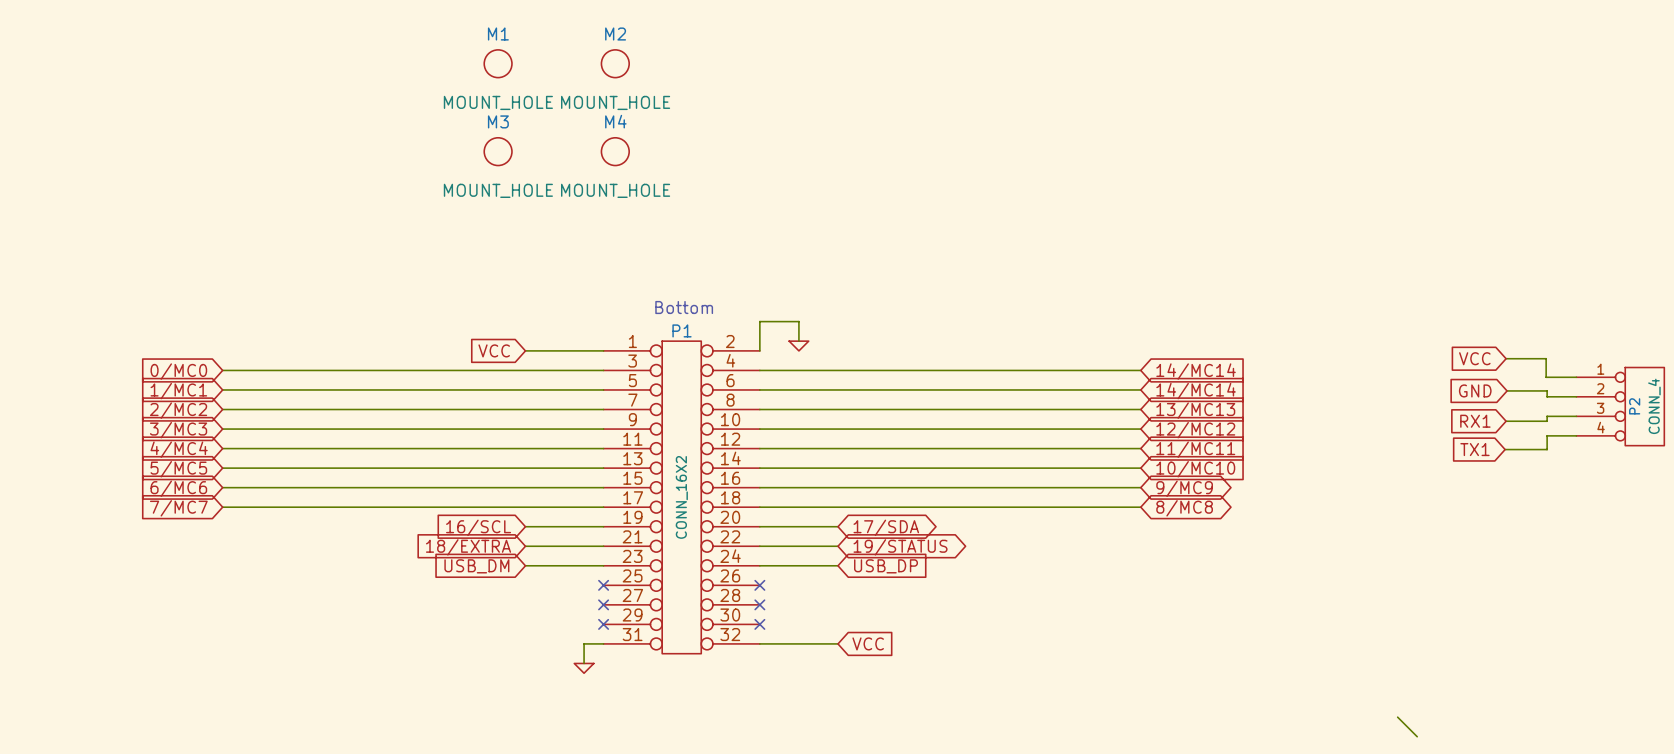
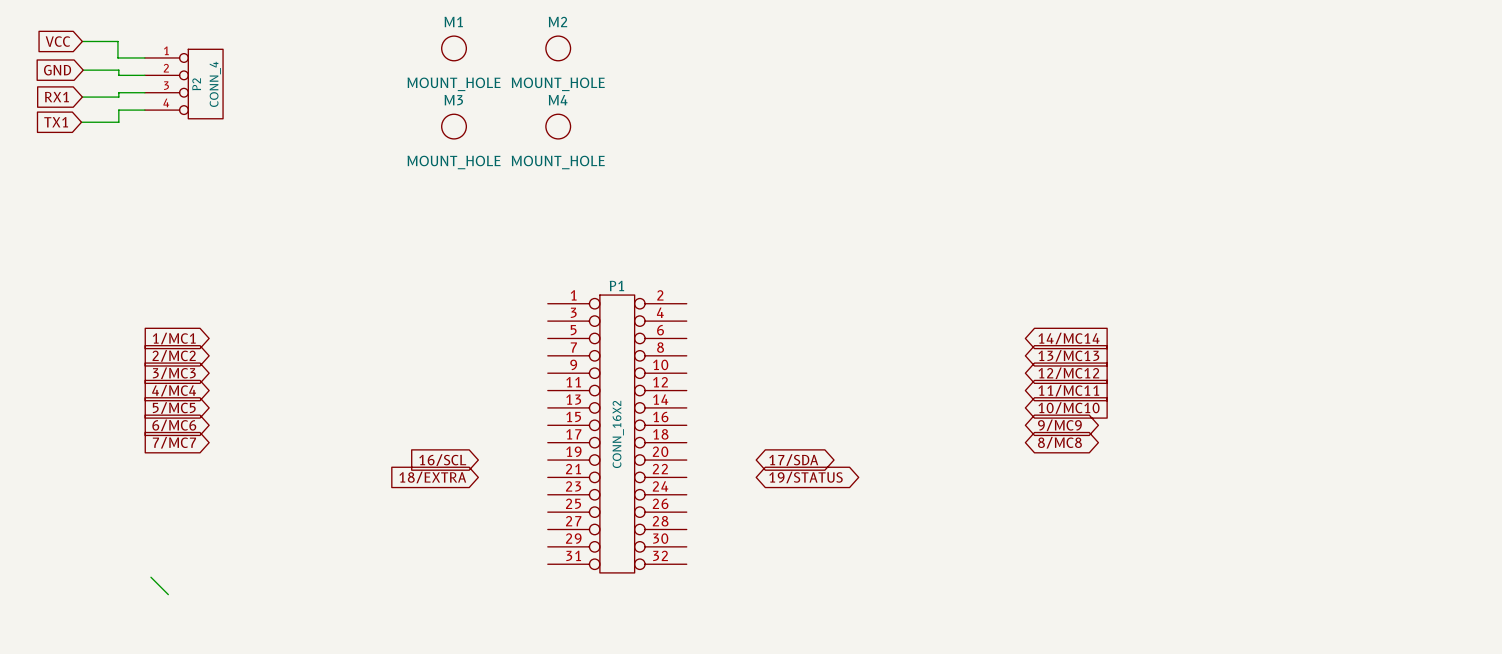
global label: none -> VCC (57, 41)
wire: none -> (82, 41) (117, 41) (117, 57) (144, 57)
global label: none -> GND (57, 70)
wire: none -> (83, 70) (118, 70) (118, 75) (144, 75)
wire: none -> (144, 92) (118, 92) (118, 97) (82, 97)
global label: none -> RX1 (56, 97)
wire: none -> (144, 110) (118, 110) (118, 122) (81, 122)
global label: none -> TX1 (56, 122)
text: Bottom (684, 307) -> none
wire: (798, 341) (798, 321) (759, 321) (759, 350) -> none
power symbol: (798, 346) -> none
global label: VCC (494, 350) -> none
wire: (525, 350) (603, 350) -> none
global label: VCC (1474, 358) -> none
wire: (1506, 358) (1546, 358) (1546, 377) (1576, 377) -> none
wire: (222, 370) (603, 370) -> none
wire: (759, 370) (1140, 370) -> none
global label: 0/MC0 (178, 371) -> none
global label: 14/MC14 (1196, 371) -> none
wire: (222, 389) (603, 389) -> none
wire: (759, 389) (1140, 389) -> none
global label: GND (1475, 390) -> none
wire: (1507, 390) (1547, 390) (1547, 396) (1576, 396) -> none
P2 position: (1620, 406) -> (183, 84)
wire: (222, 409) (603, 409) -> none
wire: (759, 409) (1140, 409) -> none
wire: (1576, 416) (1547, 416) (1547, 421) (1506, 421) -> none
global label: RX1 (1475, 421) -> none
wire: (222, 429) (603, 429) -> none
wire: (759, 429) (1140, 429) -> none
wire: (1576, 435) (1547, 435) (1547, 449) (1505, 449) -> none
wire: (222, 448) (603, 448) -> none
wire: (759, 448) (1140, 448) -> none
global label: TX1 (1474, 449) -> none
wire: (222, 468) (603, 468) -> none
wire: (759, 468) (1140, 468) -> none
wire: (222, 487) (603, 487) -> none
wire: (759, 487) (1140, 487) -> none
wire: (222, 507) (603, 507) -> none
wire: (759, 507) (1140, 507) -> none
wire: (525, 526) (603, 526) -> none
wire: (759, 526) (838, 526) -> none
wire: (525, 546) (603, 546) -> none
wire: (759, 546) (838, 546) -> none
wire: (525, 565) (603, 565) -> none
wire: (759, 565) (838, 565) -> none
global label: USB_DM (476, 566) -> none
global label: USB_DP (886, 566) -> none
no-connect mark: (603, 585) -> none
no-connect mark: (759, 585) -> none
no-connect mark: (603, 604) -> none
no-connect mark: (759, 604) -> none
no-connect mark: (603, 624) -> none
no-connect mark: (759, 624) -> none
wire: (603, 643) (584, 643) (584, 663) -> none
wire: (759, 643) (838, 643) -> none
global label: VCC (868, 643) -> none
wire: none -> (150, 577) (168, 594)
power symbol: (584, 668) -> none
wire: (1397, 717) (1417, 736) -> none

